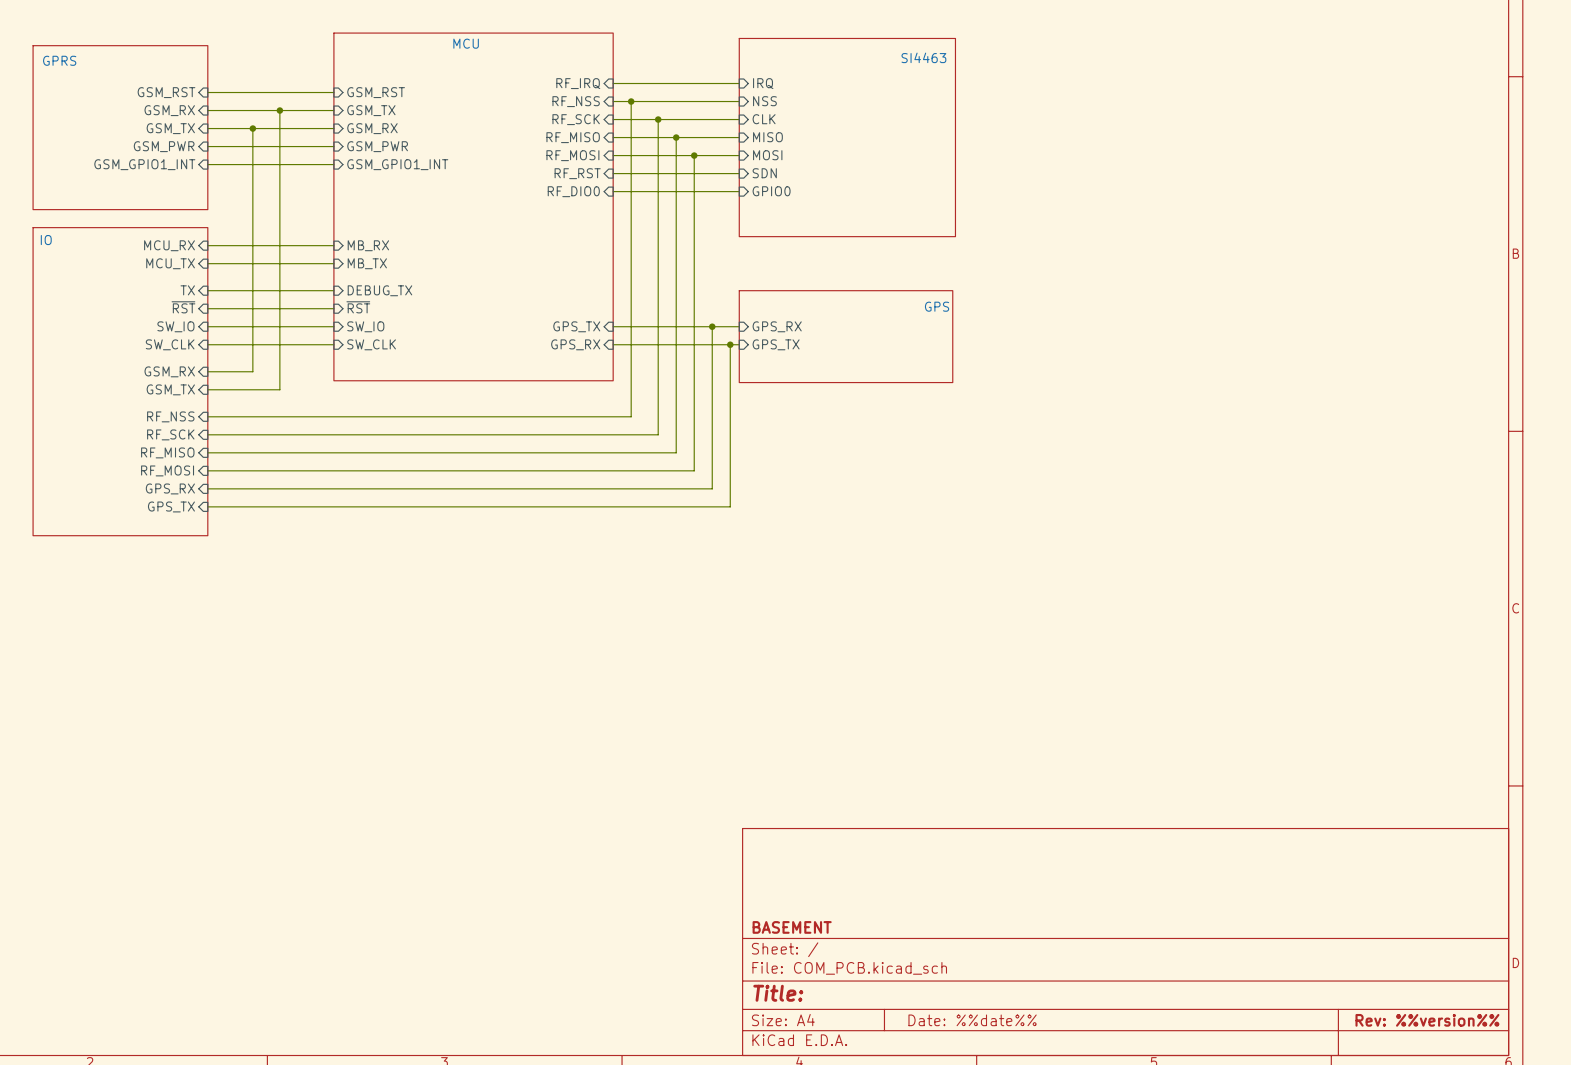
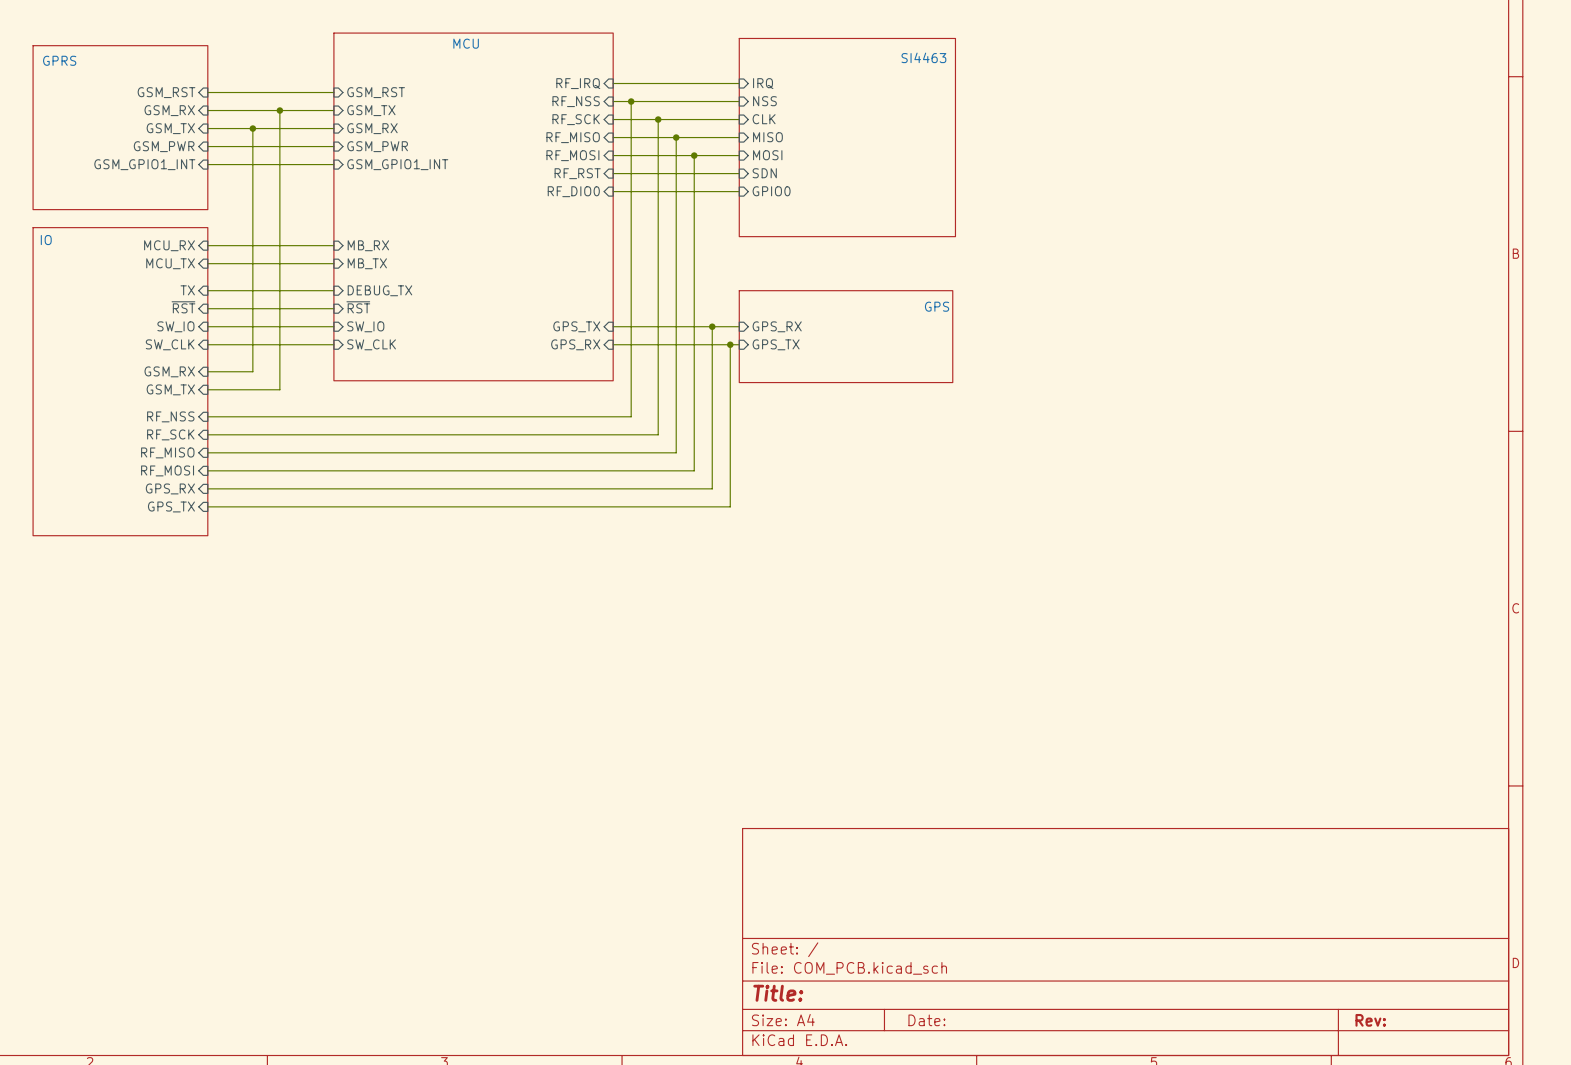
title block: BASEMENT (792, 927) -> none
title block: Date: %%date%% (972, 1020) -> Date: (926, 1020)
title block: Rev: %%version%% (1427, 1020) -> Rev: (1370, 1020)

